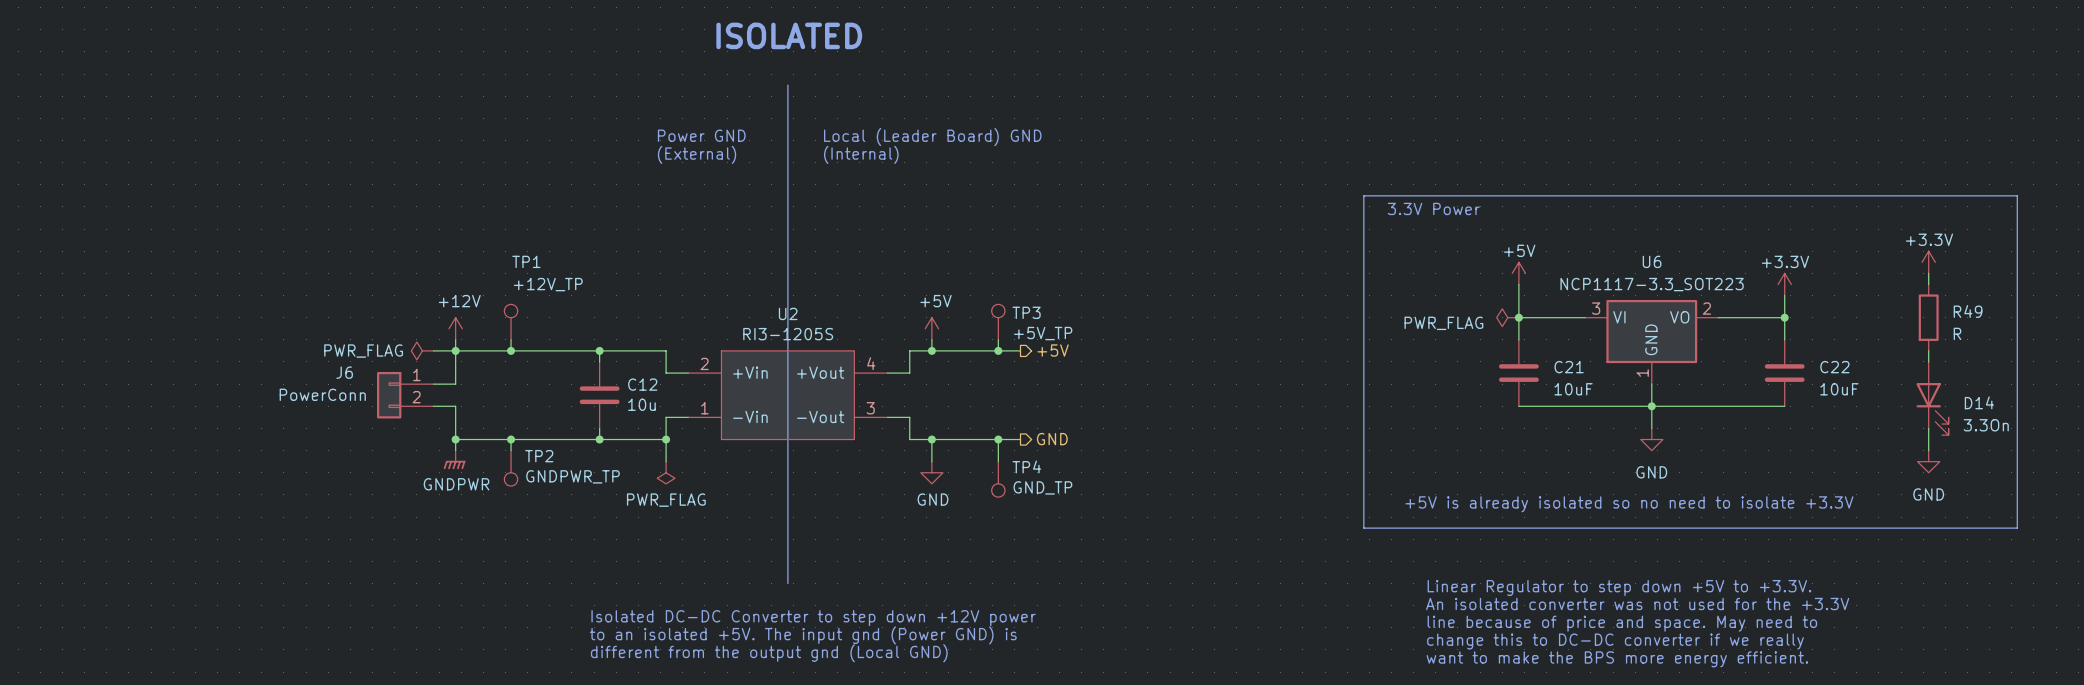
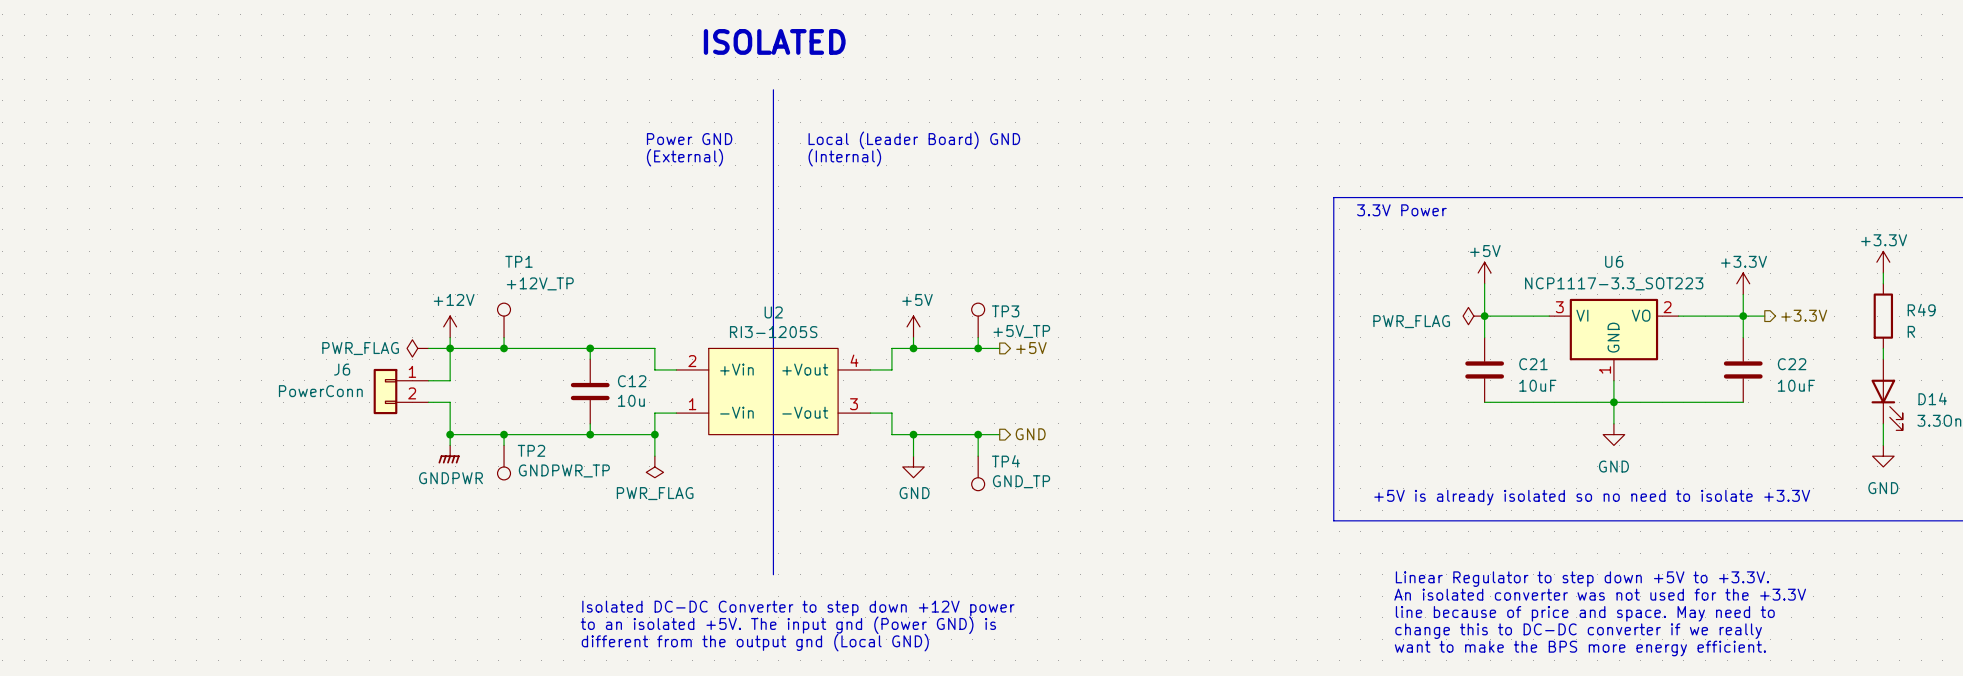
wire: none -> (1743, 316) (1764, 316)
hierarchical label: none -> +3.3V (1804, 315)

